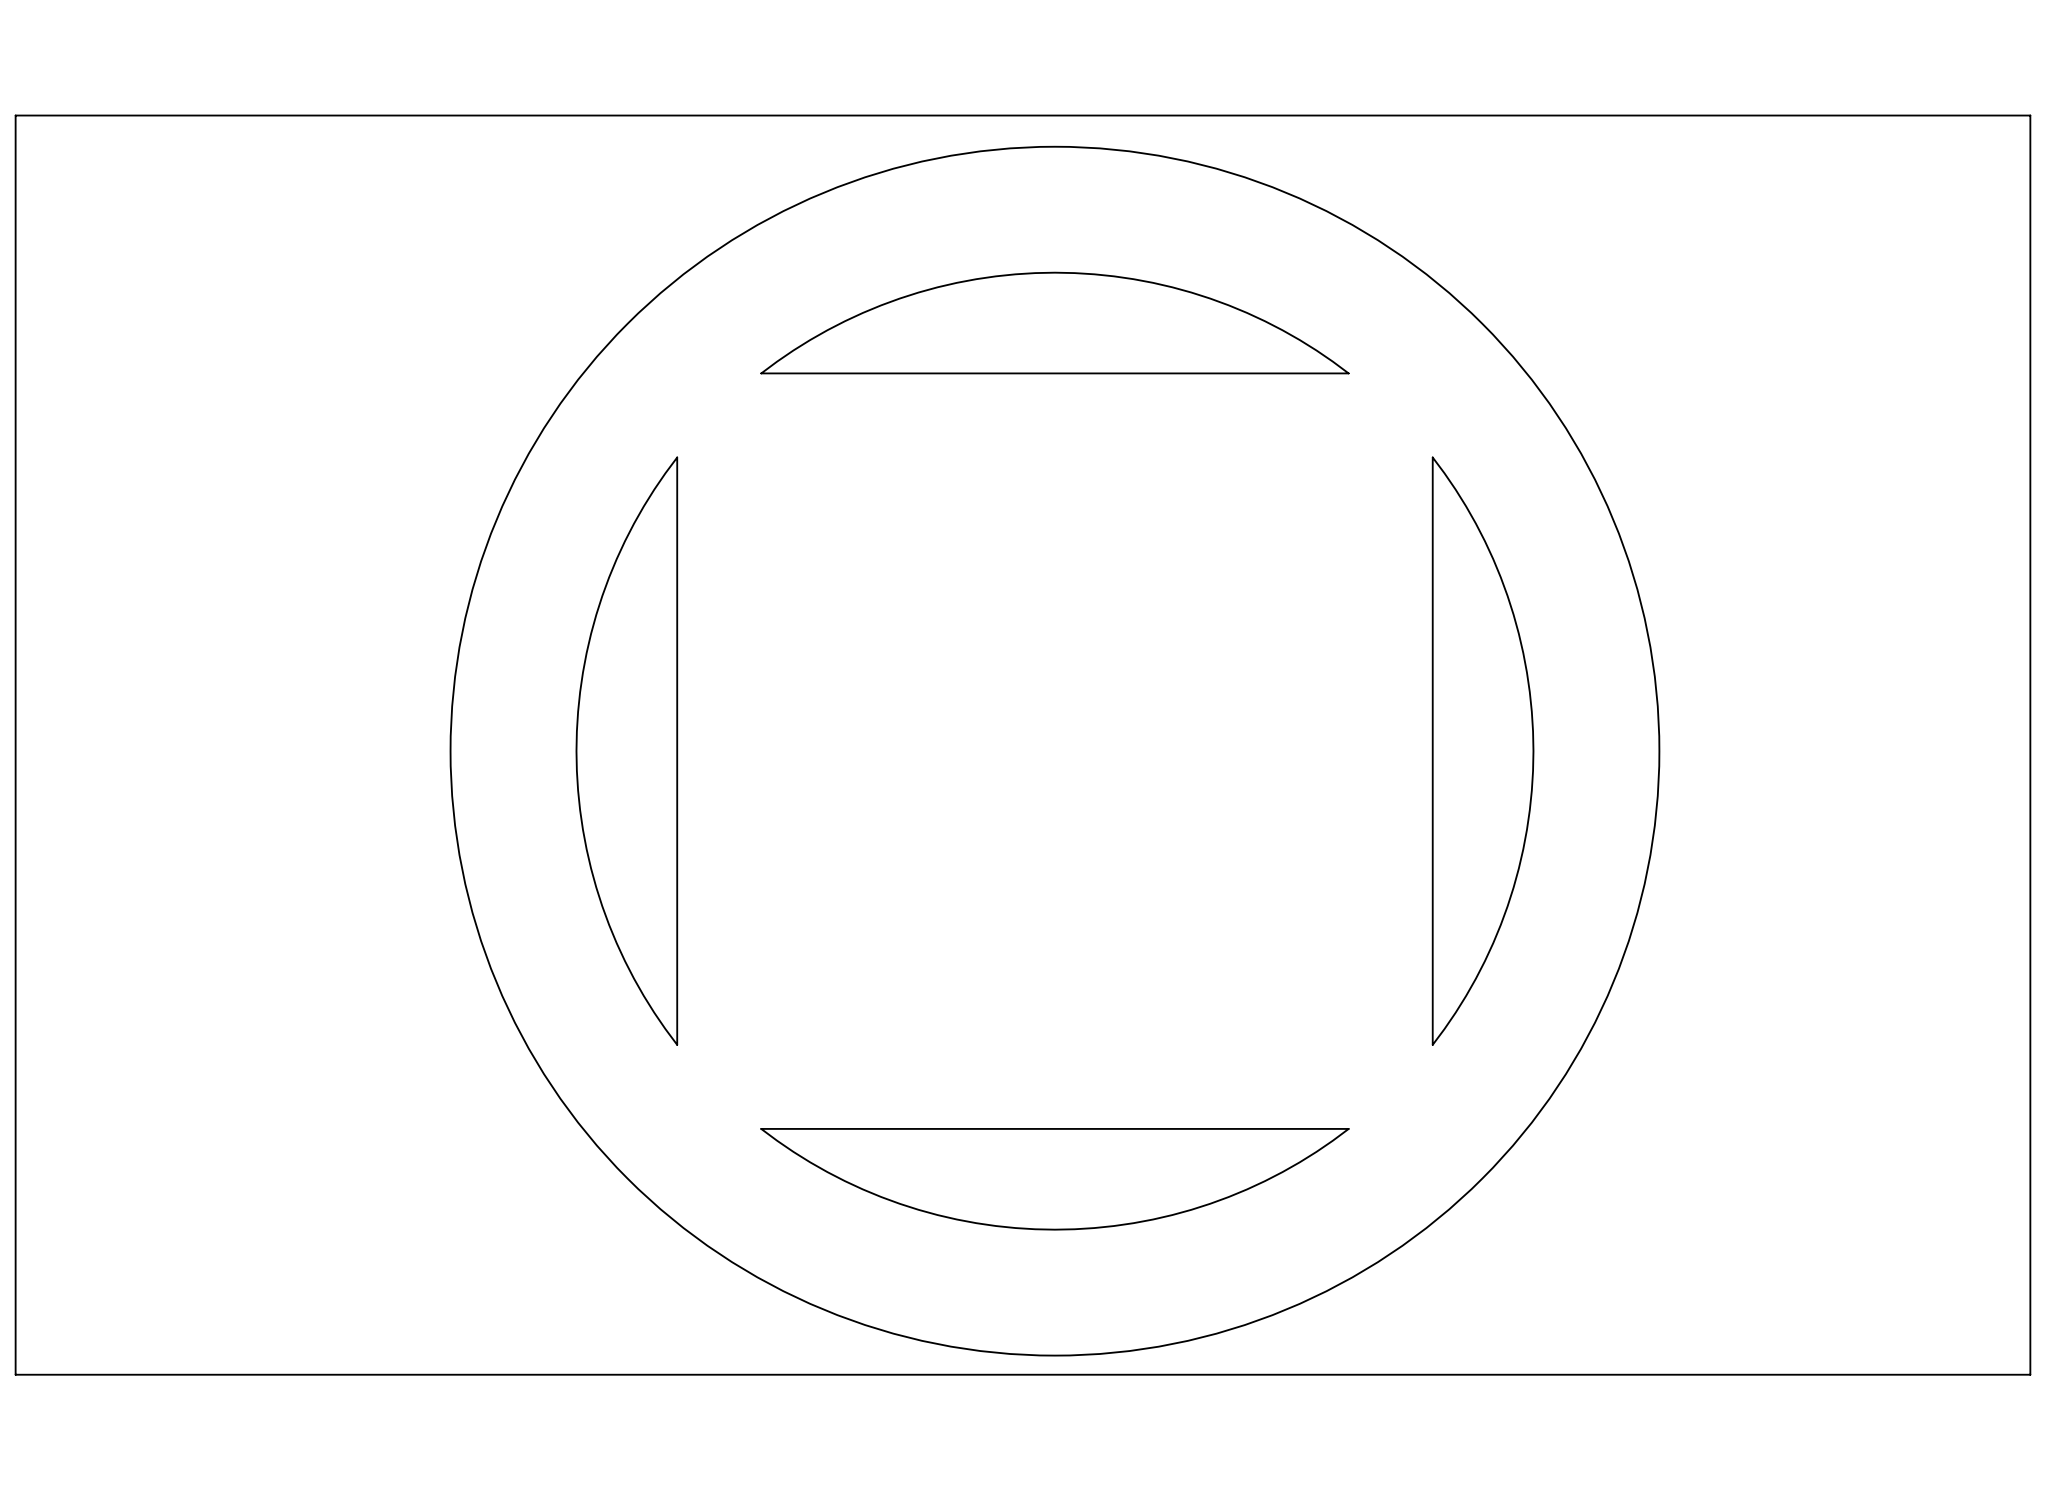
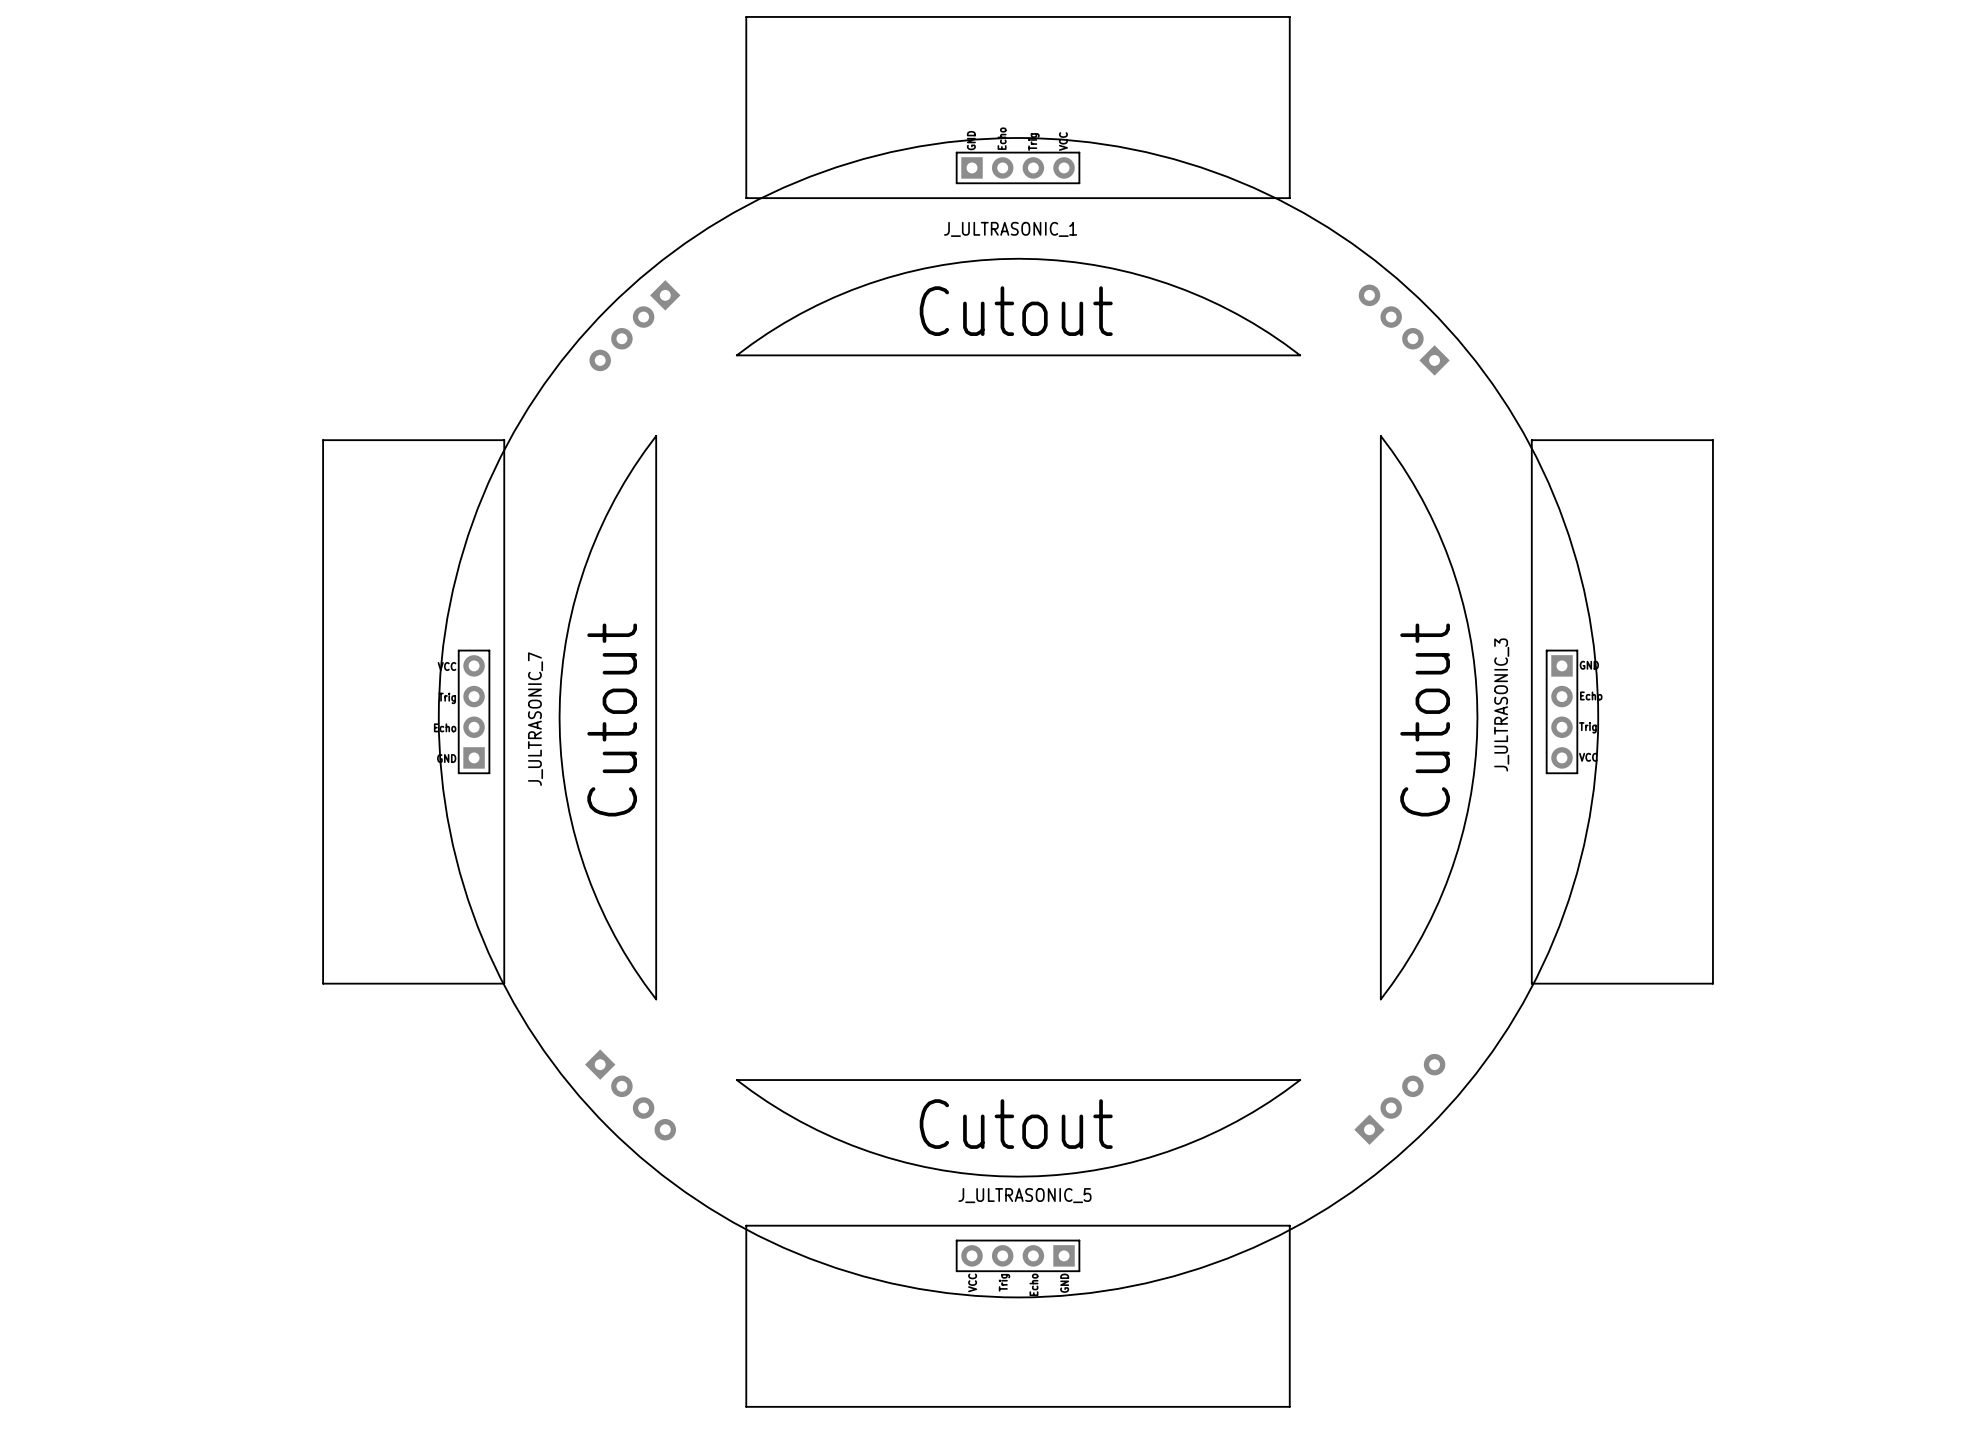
board edge: (15, 115) (2030, 115) (2030, 1374) (15, 1374) (15, 115) -> none
J_ULTRASONIC_1: none -> (1018, 107)
text: none -> Cutout (1016, 311)
part: none -> (634, 325)
part: none -> (1404, 330)
J_ULTRASONIC_7: none -> (413, 711)
J_ULTRASONIC_3: none -> (1622, 711)
text: none -> Cutout (612, 719)
text: none -> Cutout (1425, 719)
part: none -> (630, 1094)
part: none -> (1399, 1099)
text: none -> Cutout (1016, 1124)
J_ULTRASONIC_5: none -> (1018, 1316)

